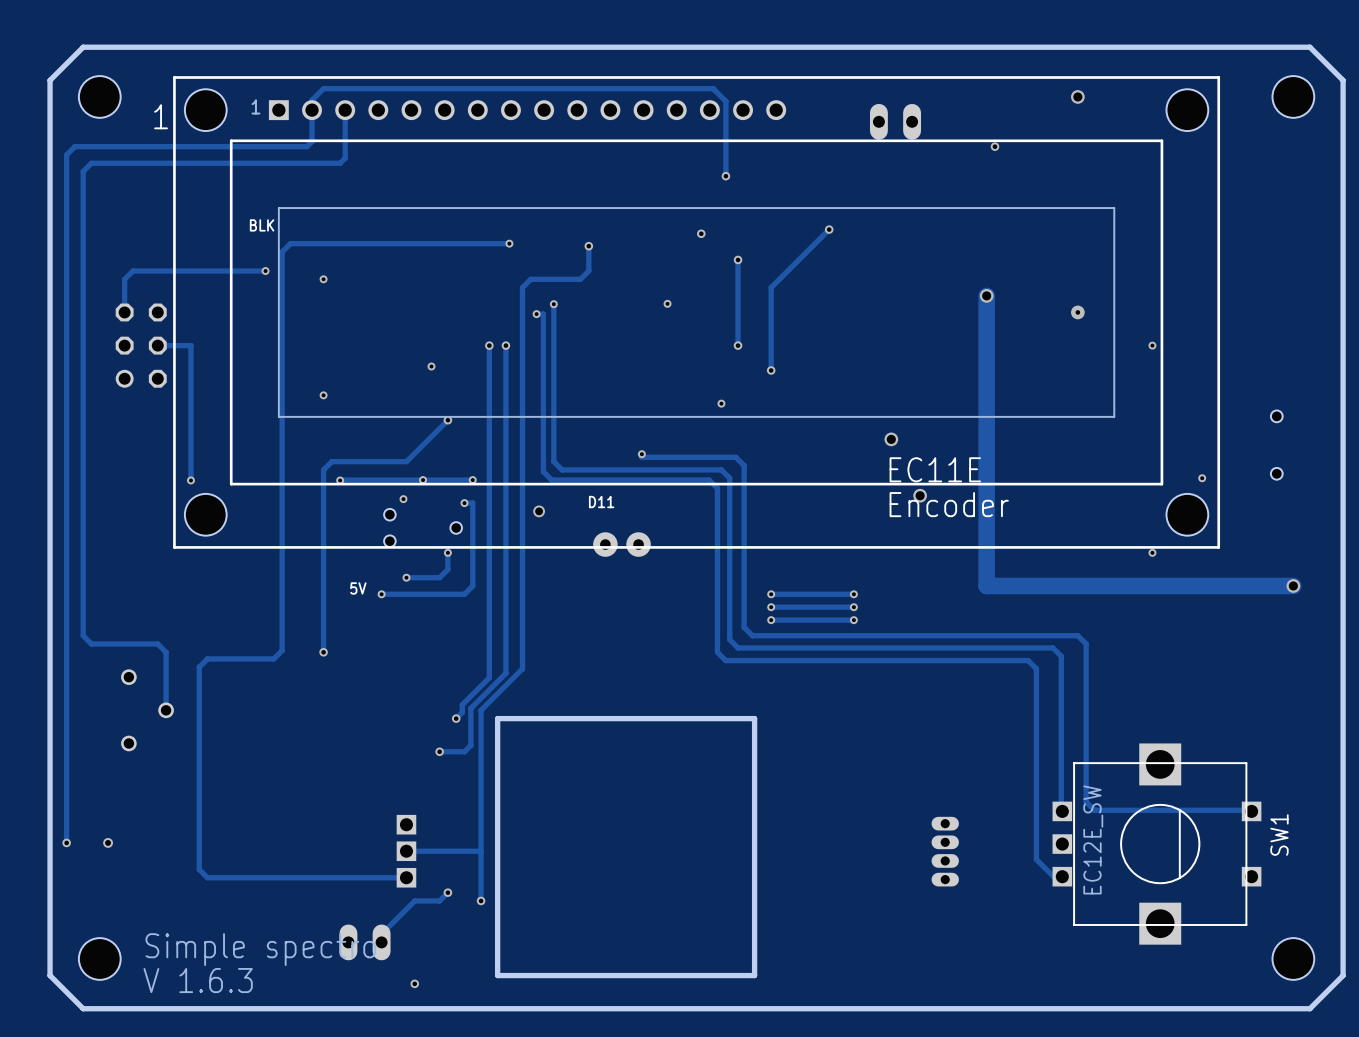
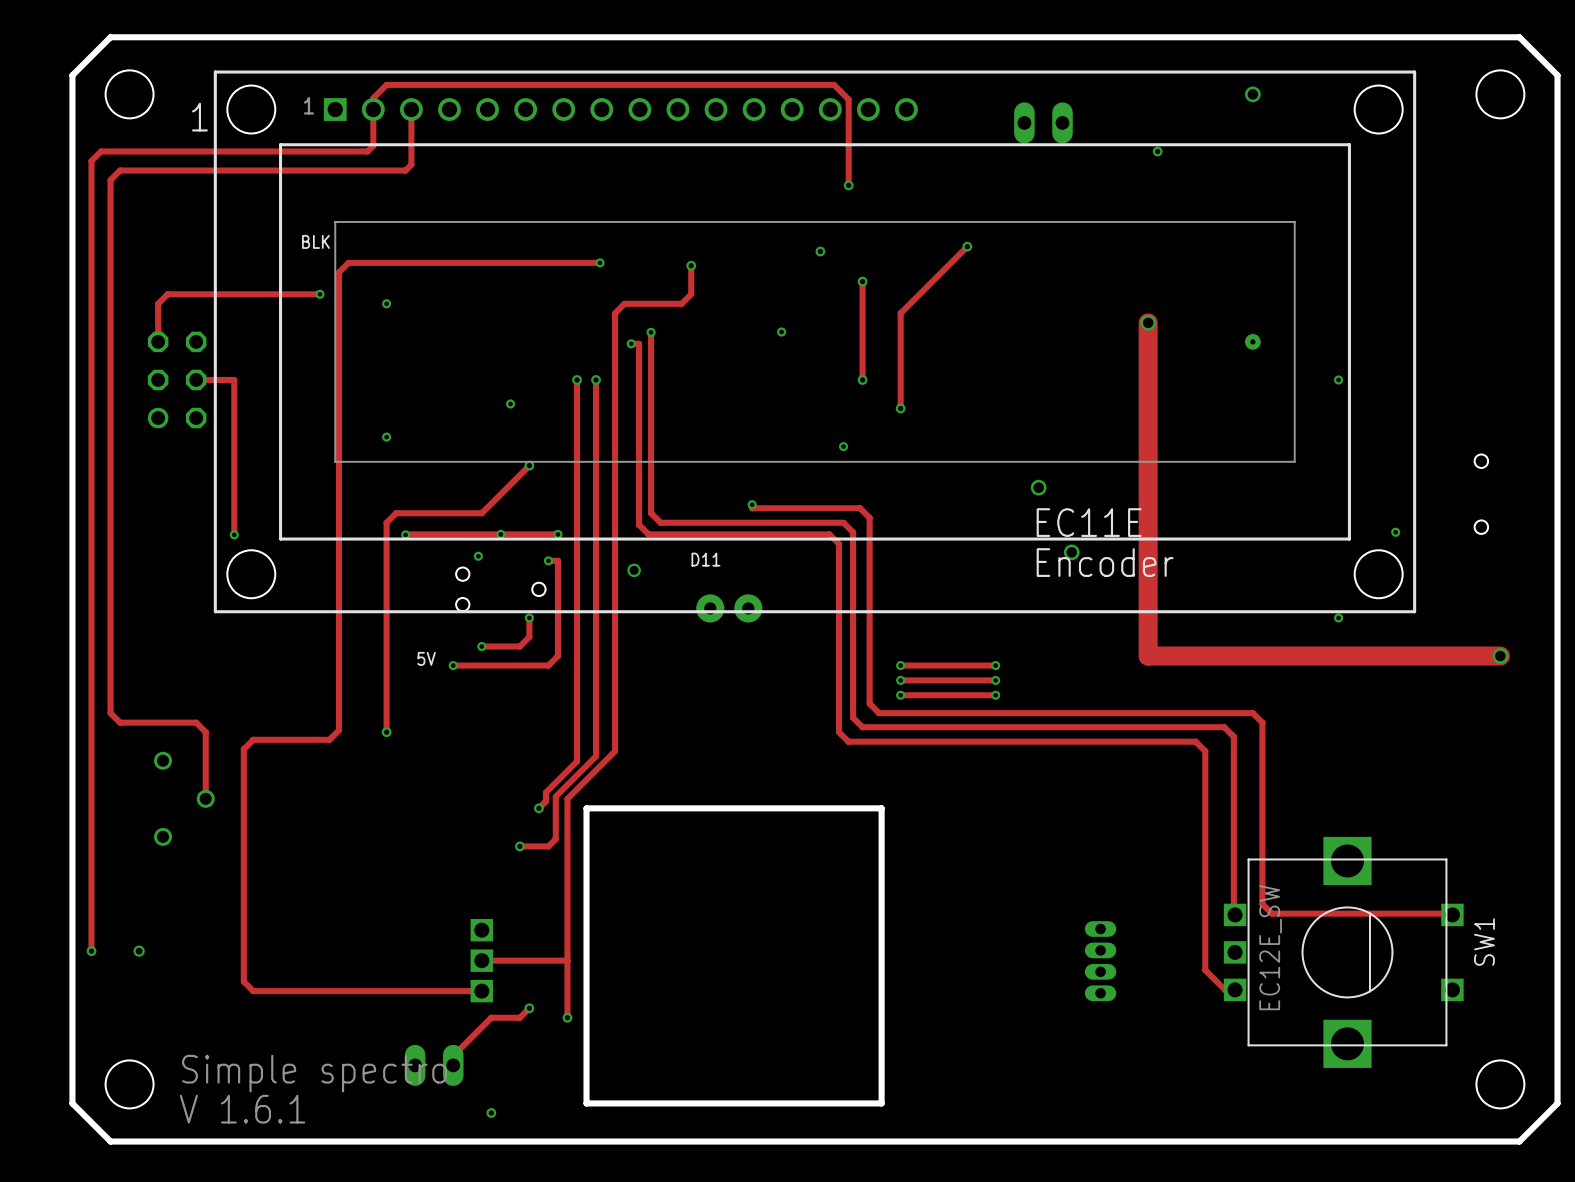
text: V 1.6.3 (198, 980) -> V 1.6.1 (242, 1109)

